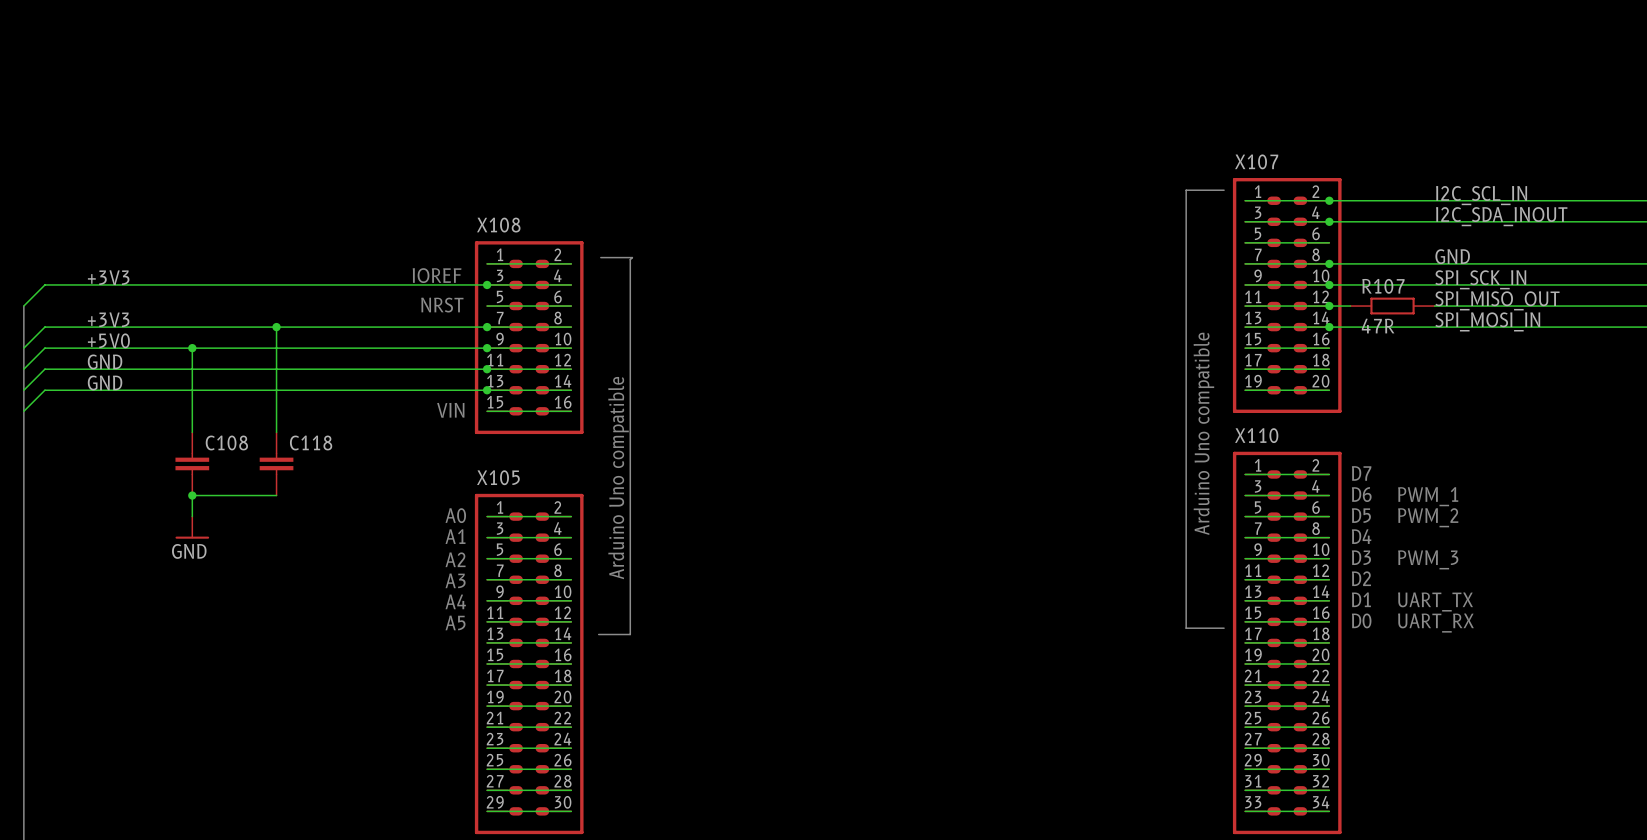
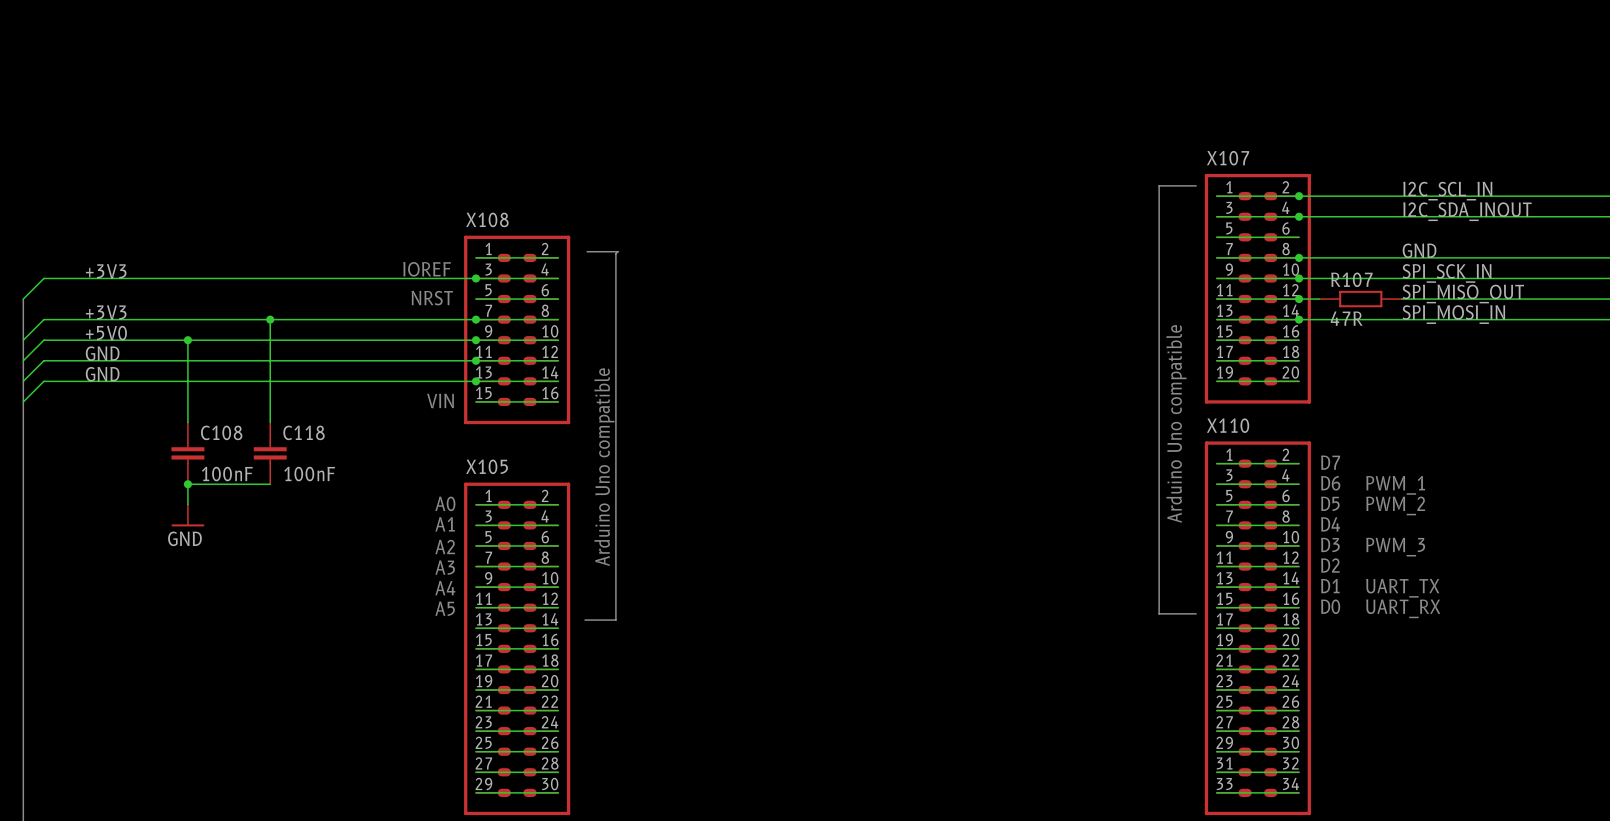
C108 value: none -> 100nF (227, 474)
C118 value: none -> 100nF (309, 474)

